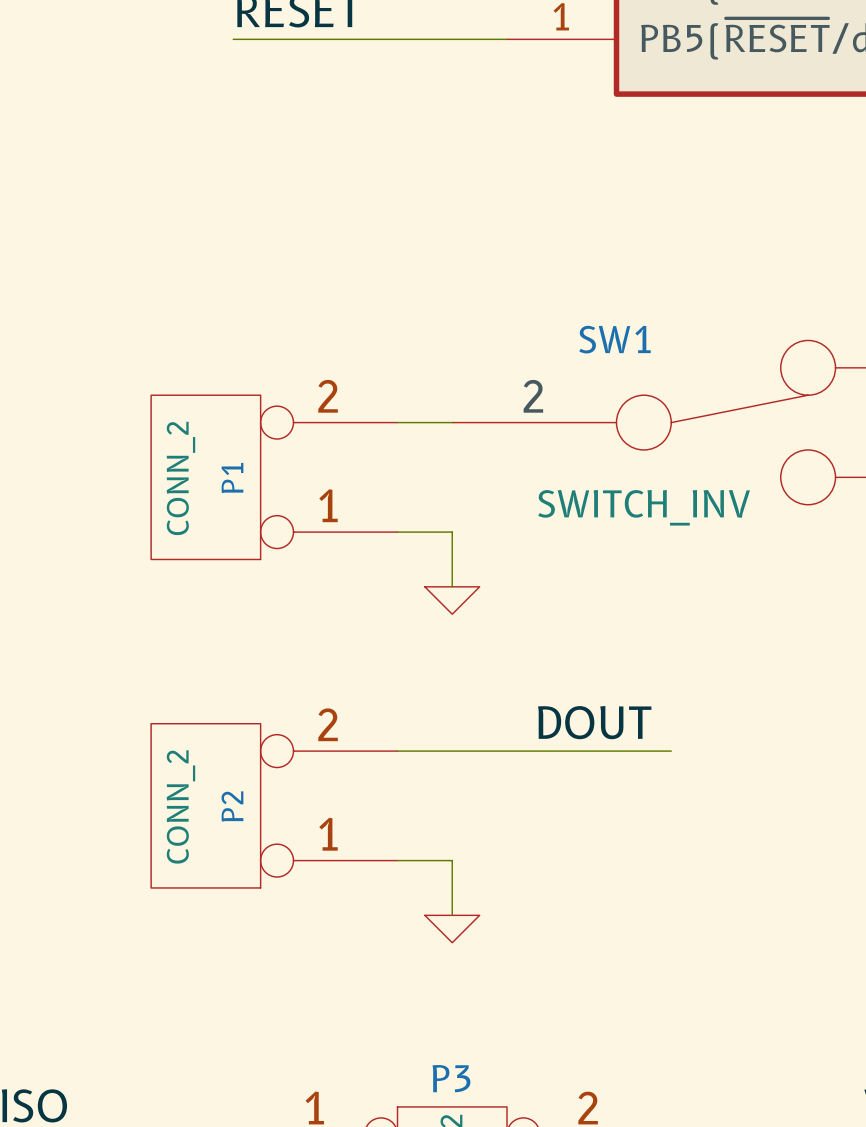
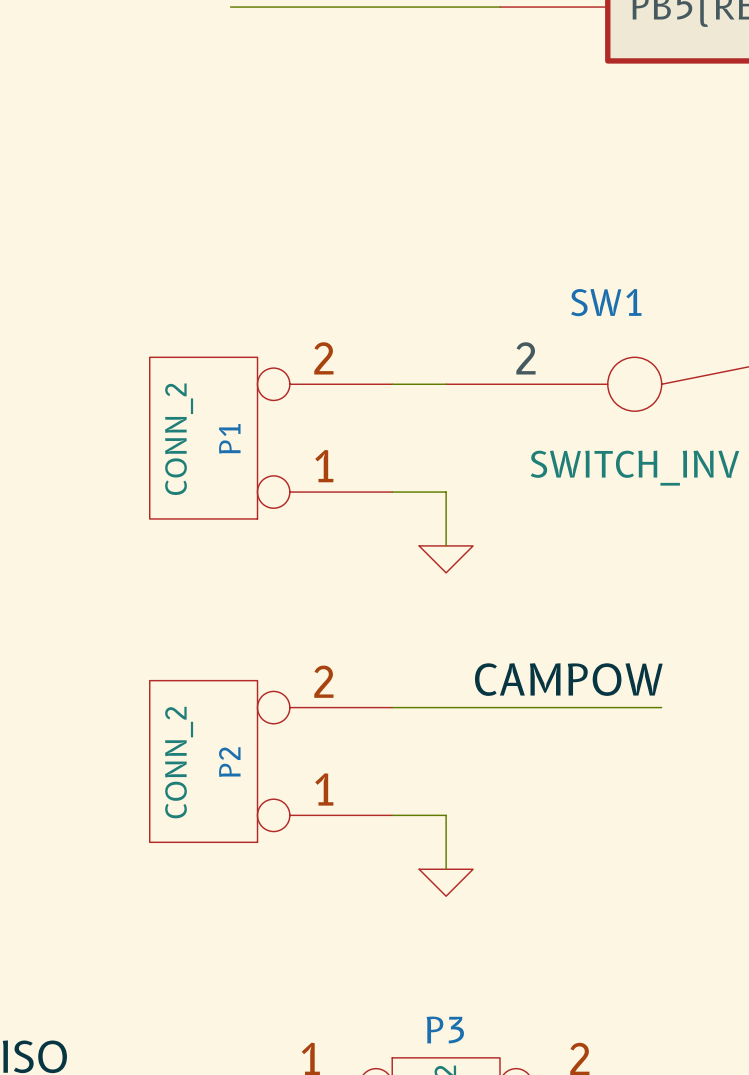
label: none -> CAMPOW (568, 679)
label: DOUT (594, 722) -> none

